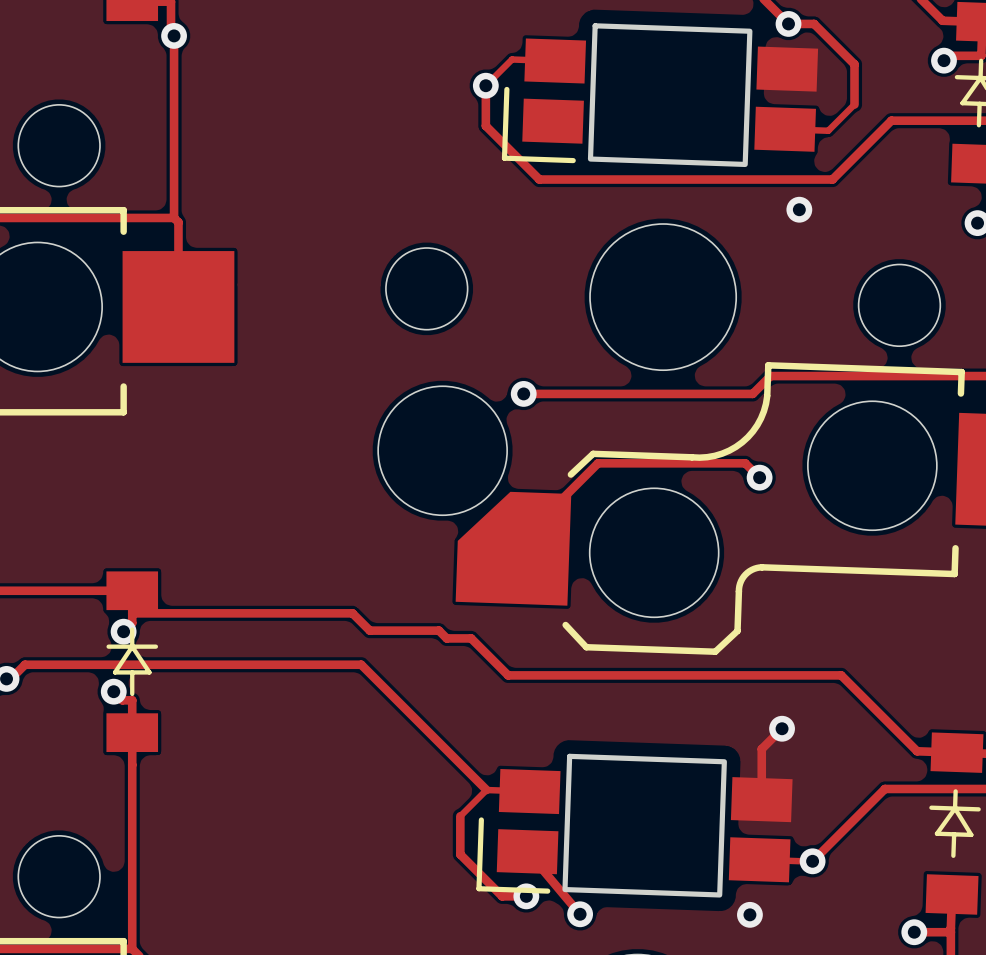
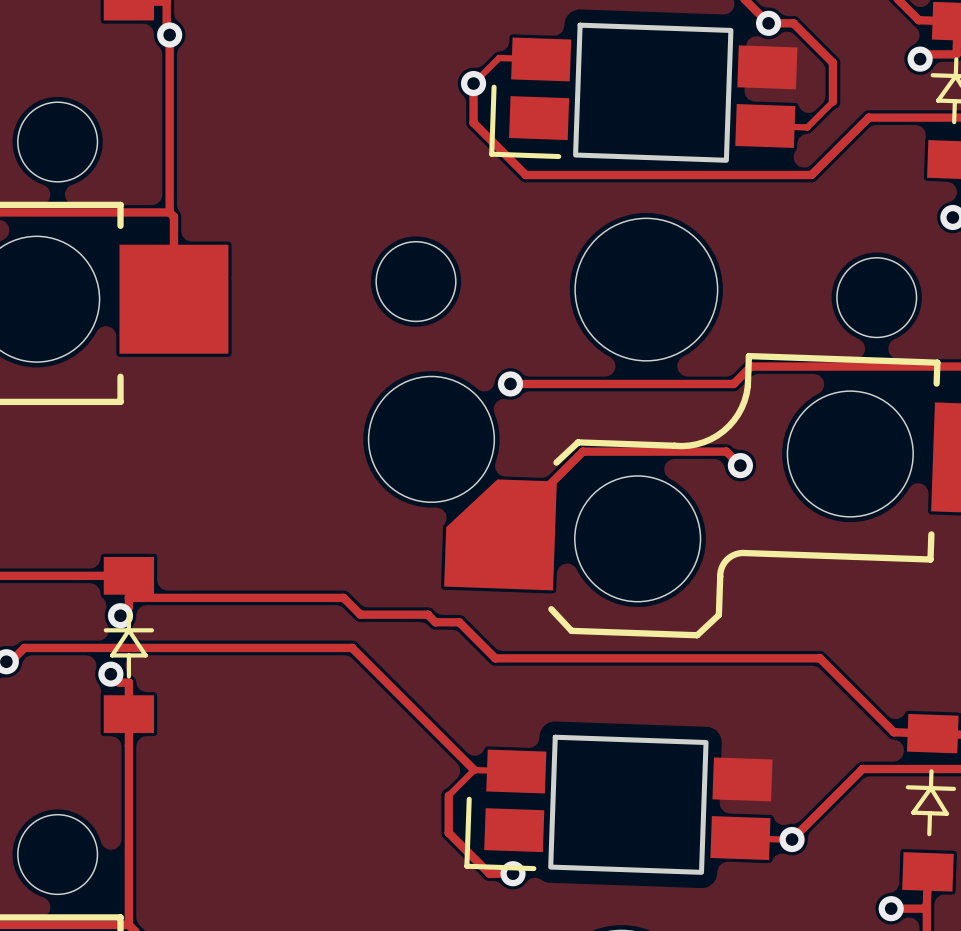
via: (799, 209) -> none
track: (782, 728) (761, 749) (761, 799) -> none
via: (782, 728) -> none
track: (527, 851) (580, 914) -> none
via: (580, 914) -> none
via: (749, 914) -> none

